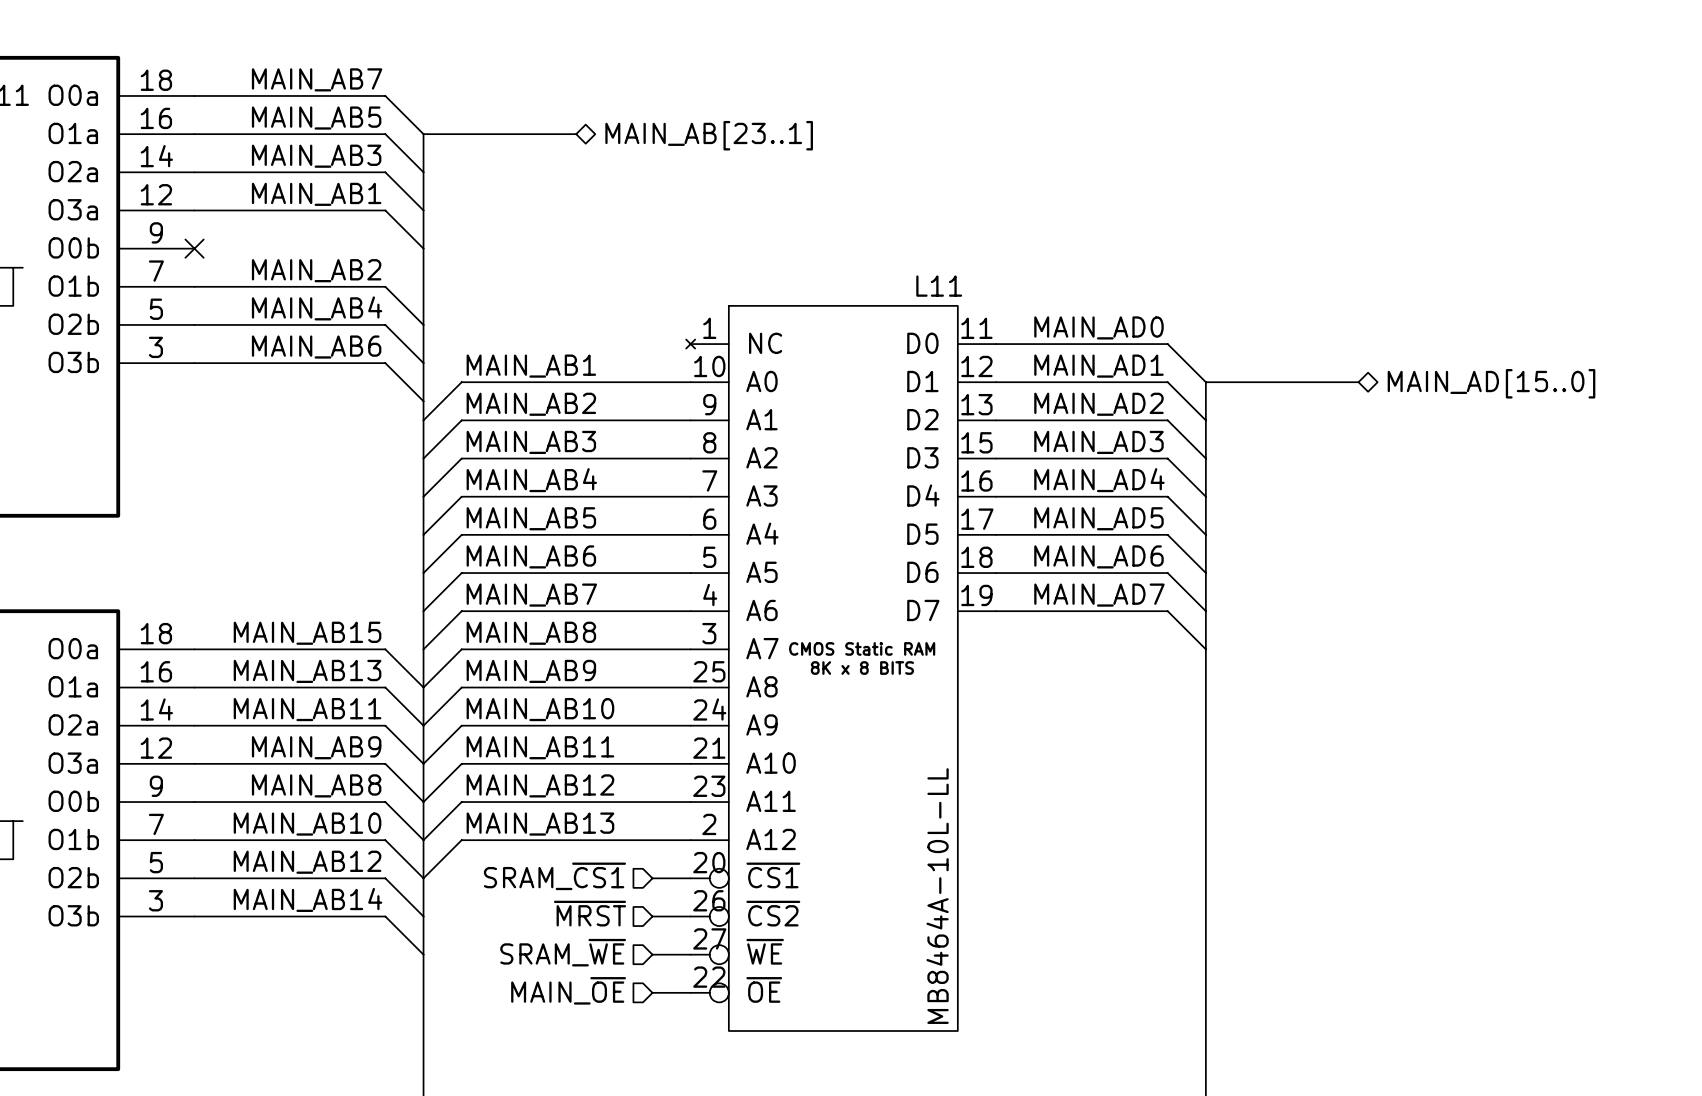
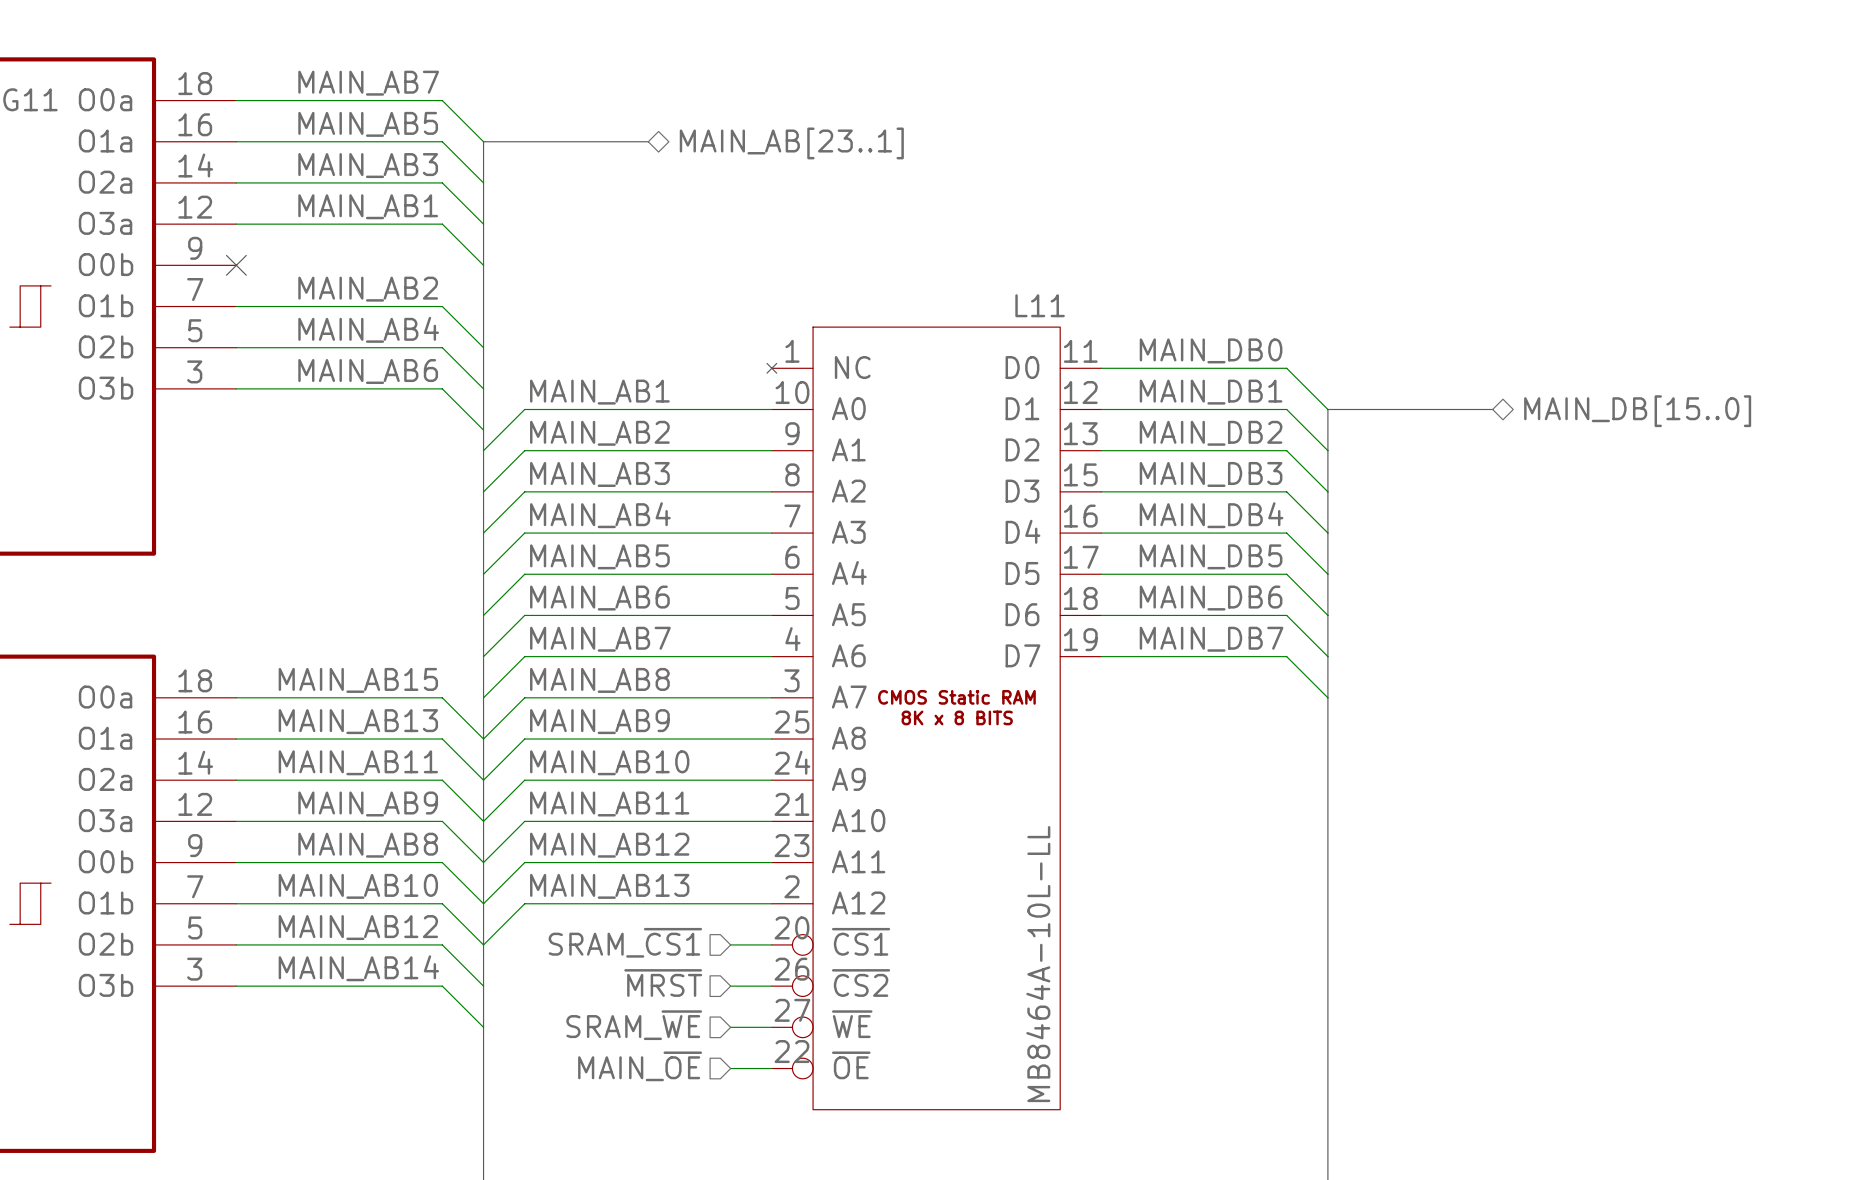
label: MAIN_AD0 (1098, 327) -> MAIN_DB0 (1211, 350)
label: MAIN_AD1 (1098, 366) -> MAIN_DB1 (1211, 392)
hierarchical label: MAIN_AD[15..0] (1491, 383) -> MAIN_DB[15..0] (1637, 411)
label: MAIN_AD2 (1098, 404) -> MAIN_DB2 (1211, 433)
label: MAIN_AD3 (1098, 442) -> MAIN_DB3 (1211, 474)
label: MAIN_AD4 (1099, 480) -> MAIN_DB4 (1211, 515)
label: MAIN_AD5 (1098, 518) -> MAIN_DB5 (1211, 556)
label: MAIN_AD6 (1098, 556) -> MAIN_DB6 (1211, 598)
label: MAIN_AD7 (1099, 595) -> MAIN_DB7 (1211, 639)

